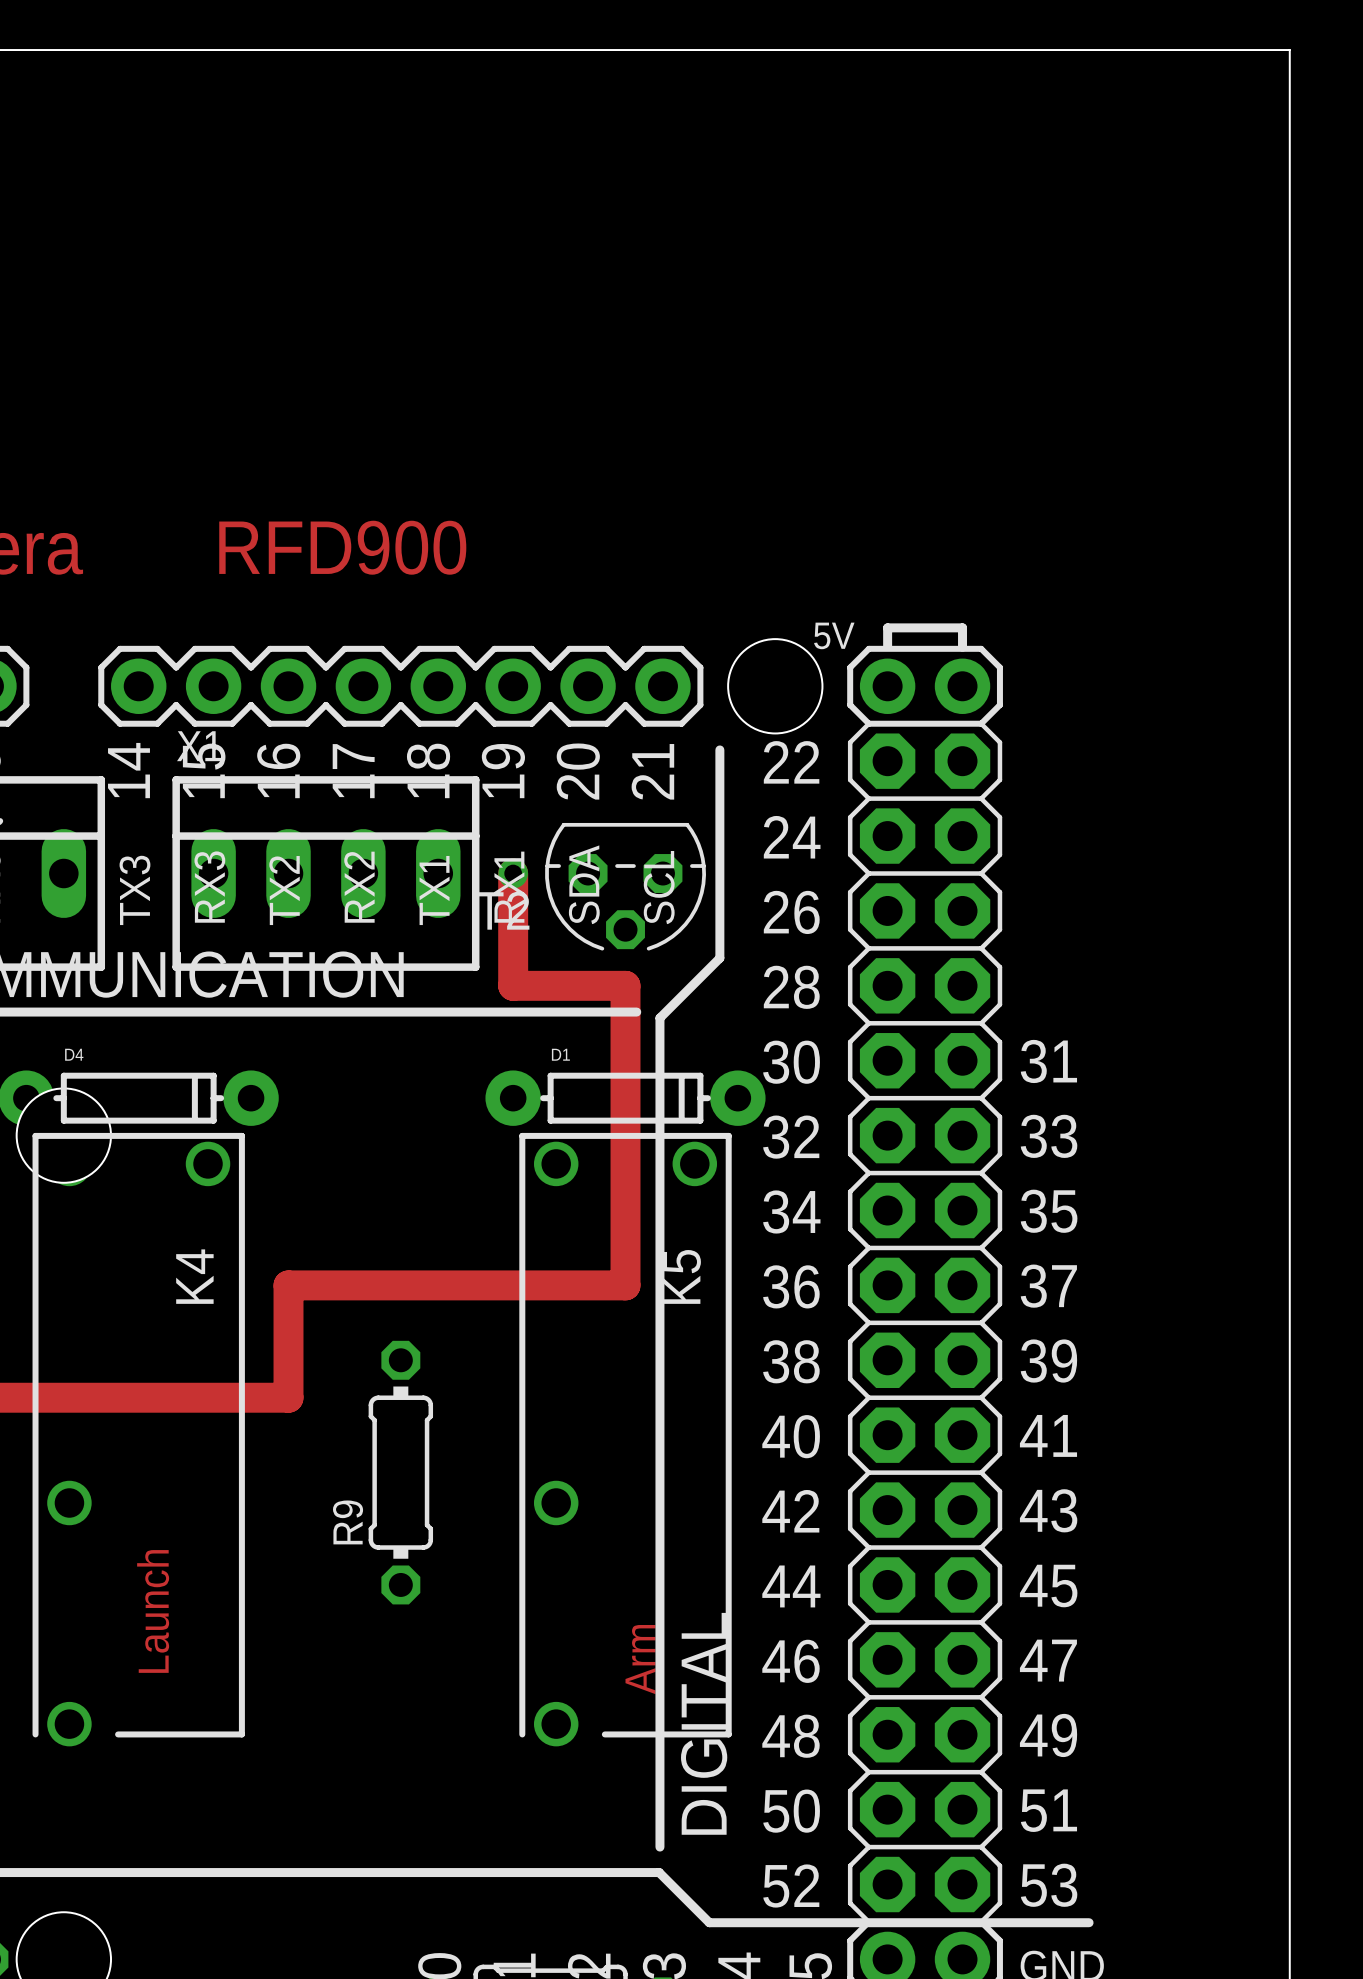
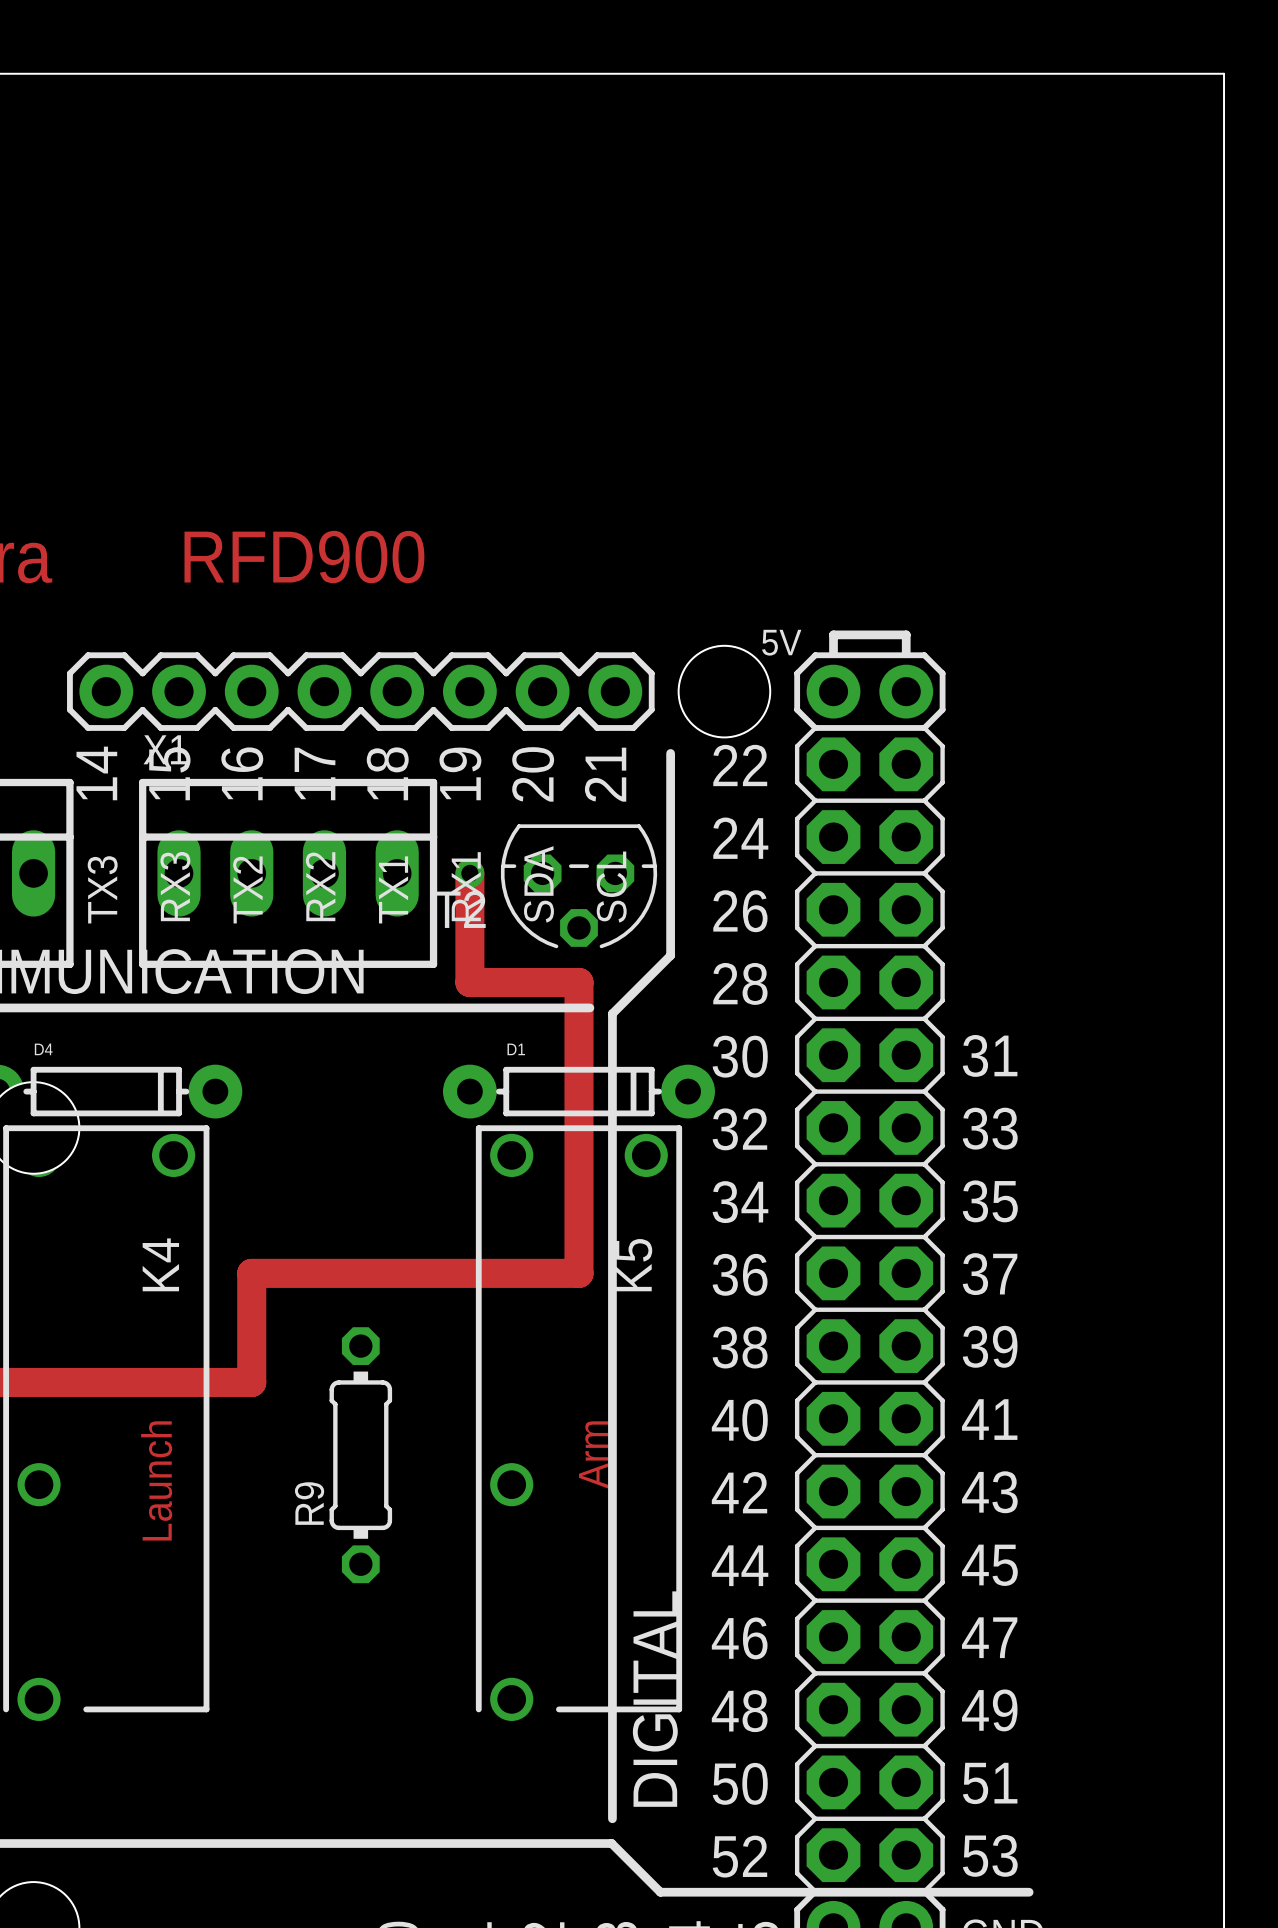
text position: Launch (153, 1611) -> Launch (156, 1480)
text position: Arm (640, 1659) -> Arm (593, 1454)

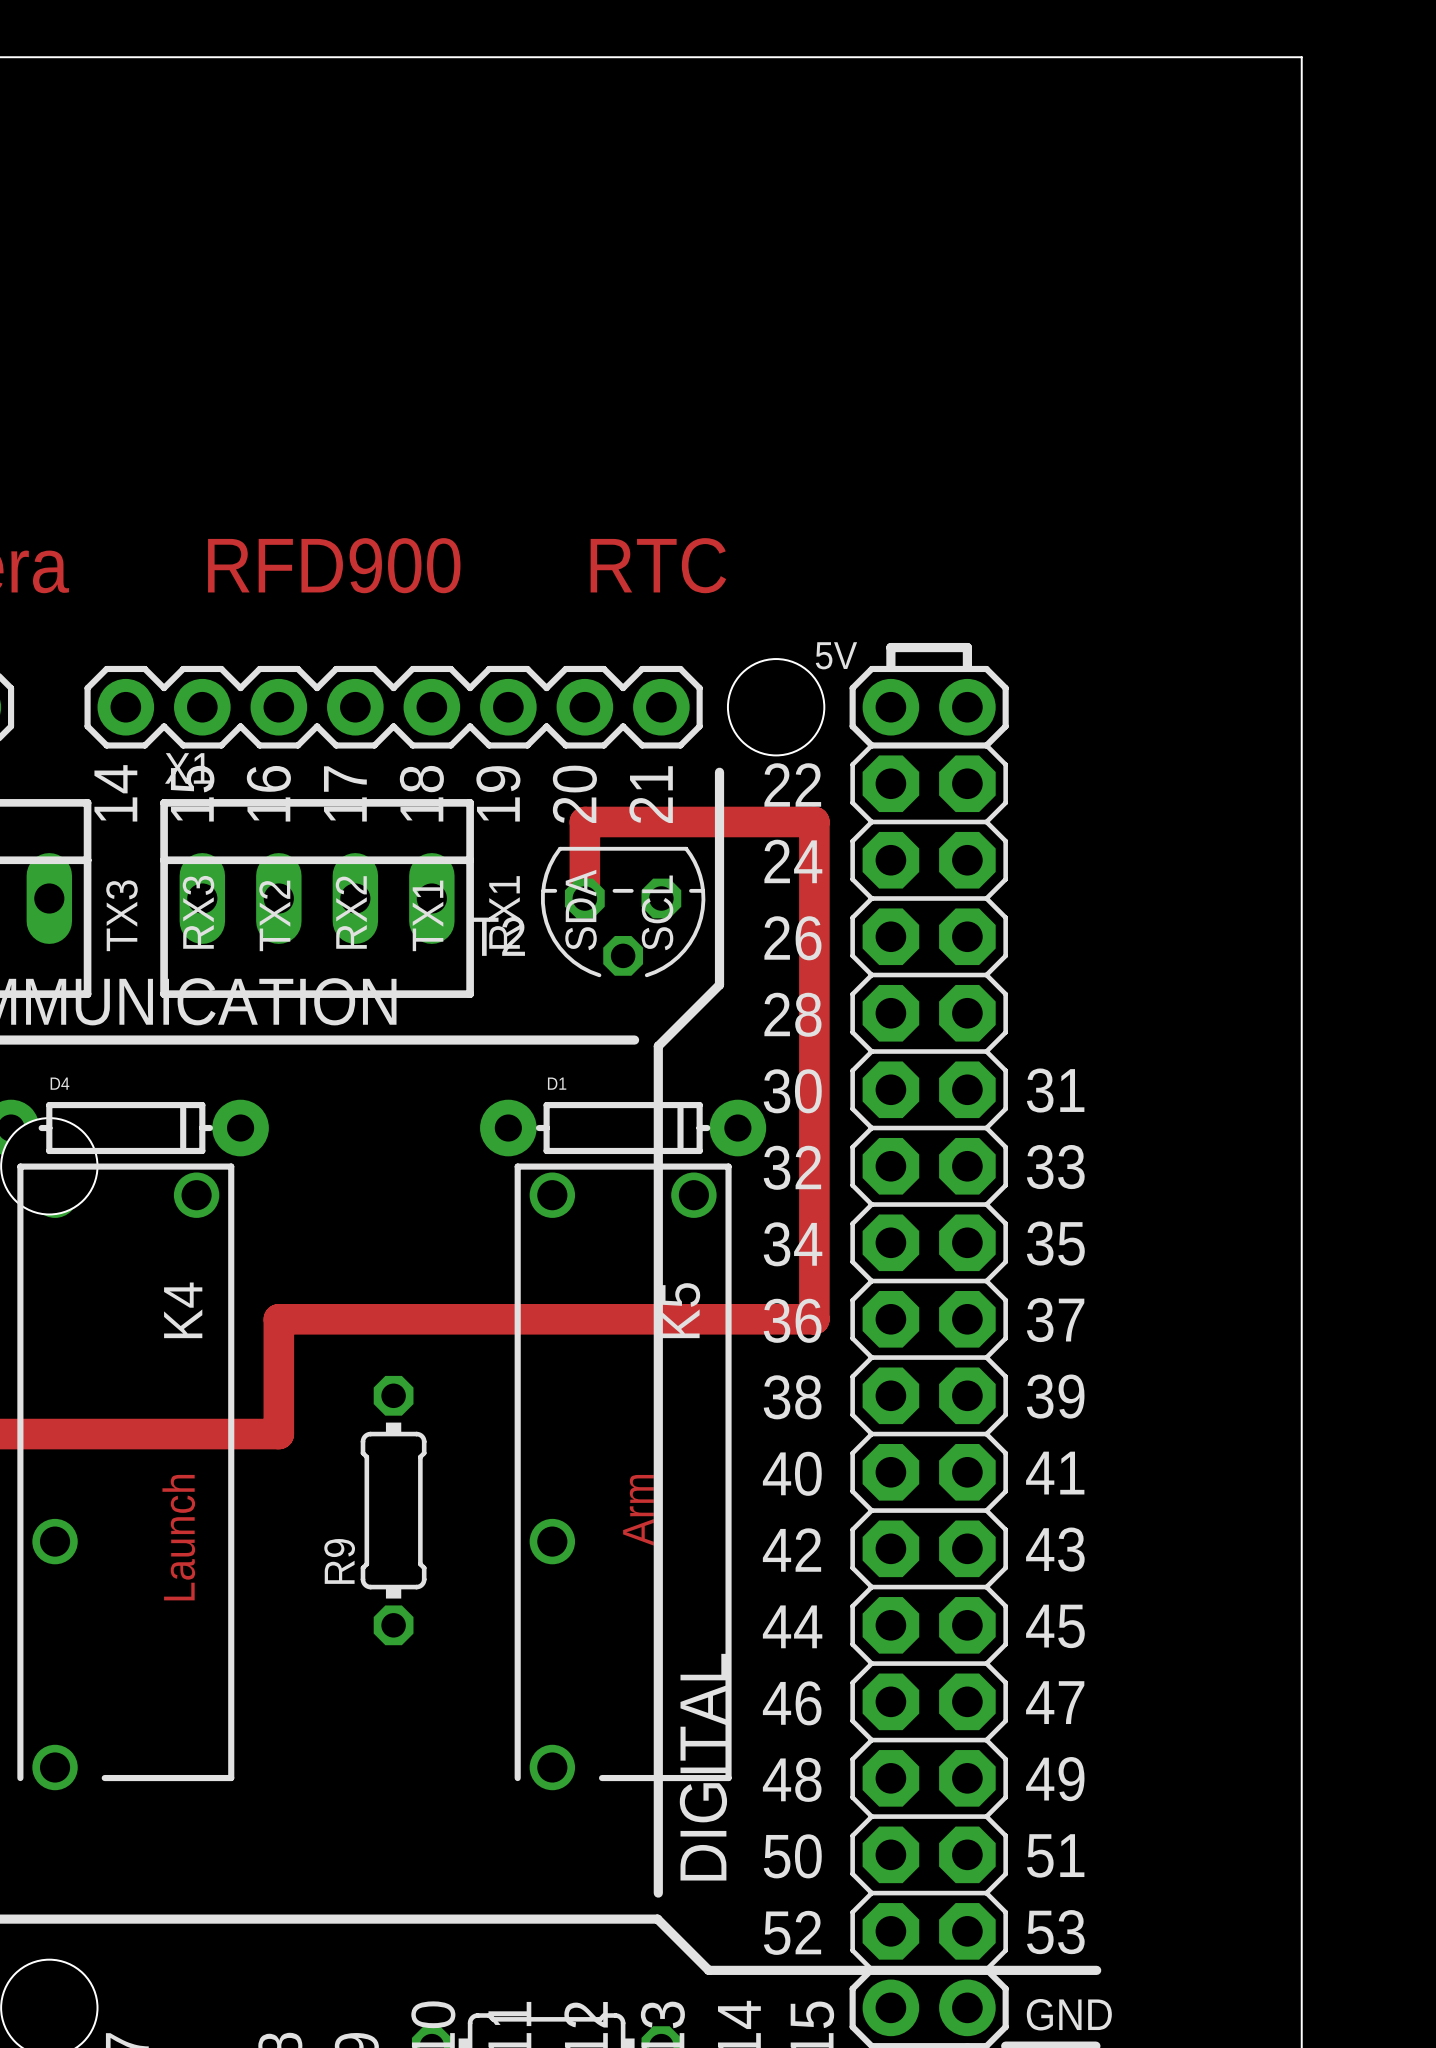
text: none -> RTC (658, 565)
track: (469, 873) (469, 982) (578, 982) (578, 1273) -> (584, 898) (584, 821) (814, 821) (814, 1319) (623, 1319)
via: (469, 873) -> none

